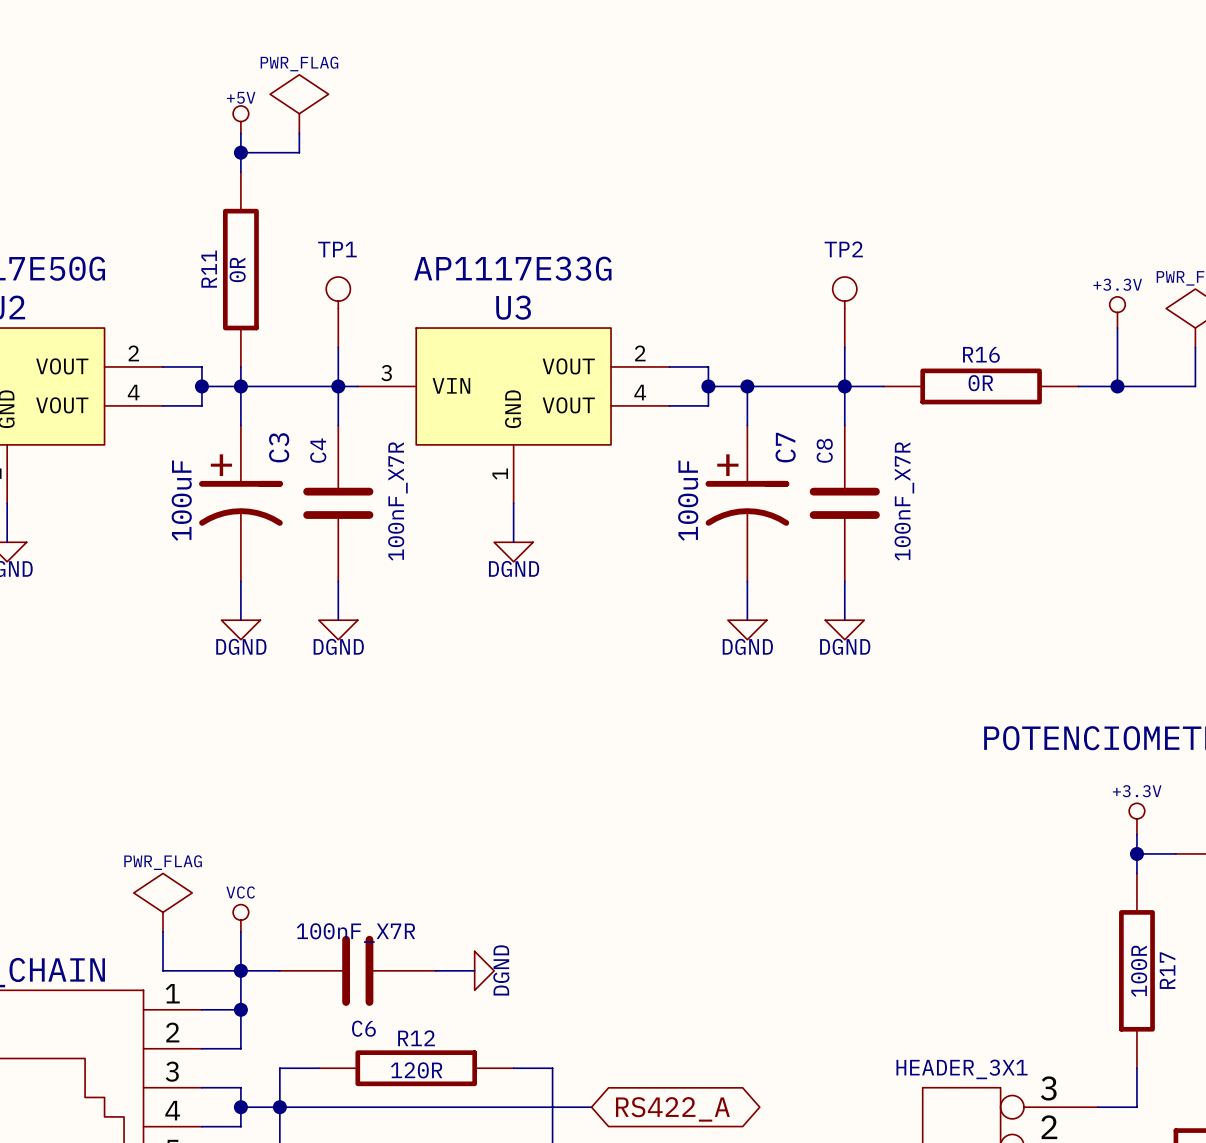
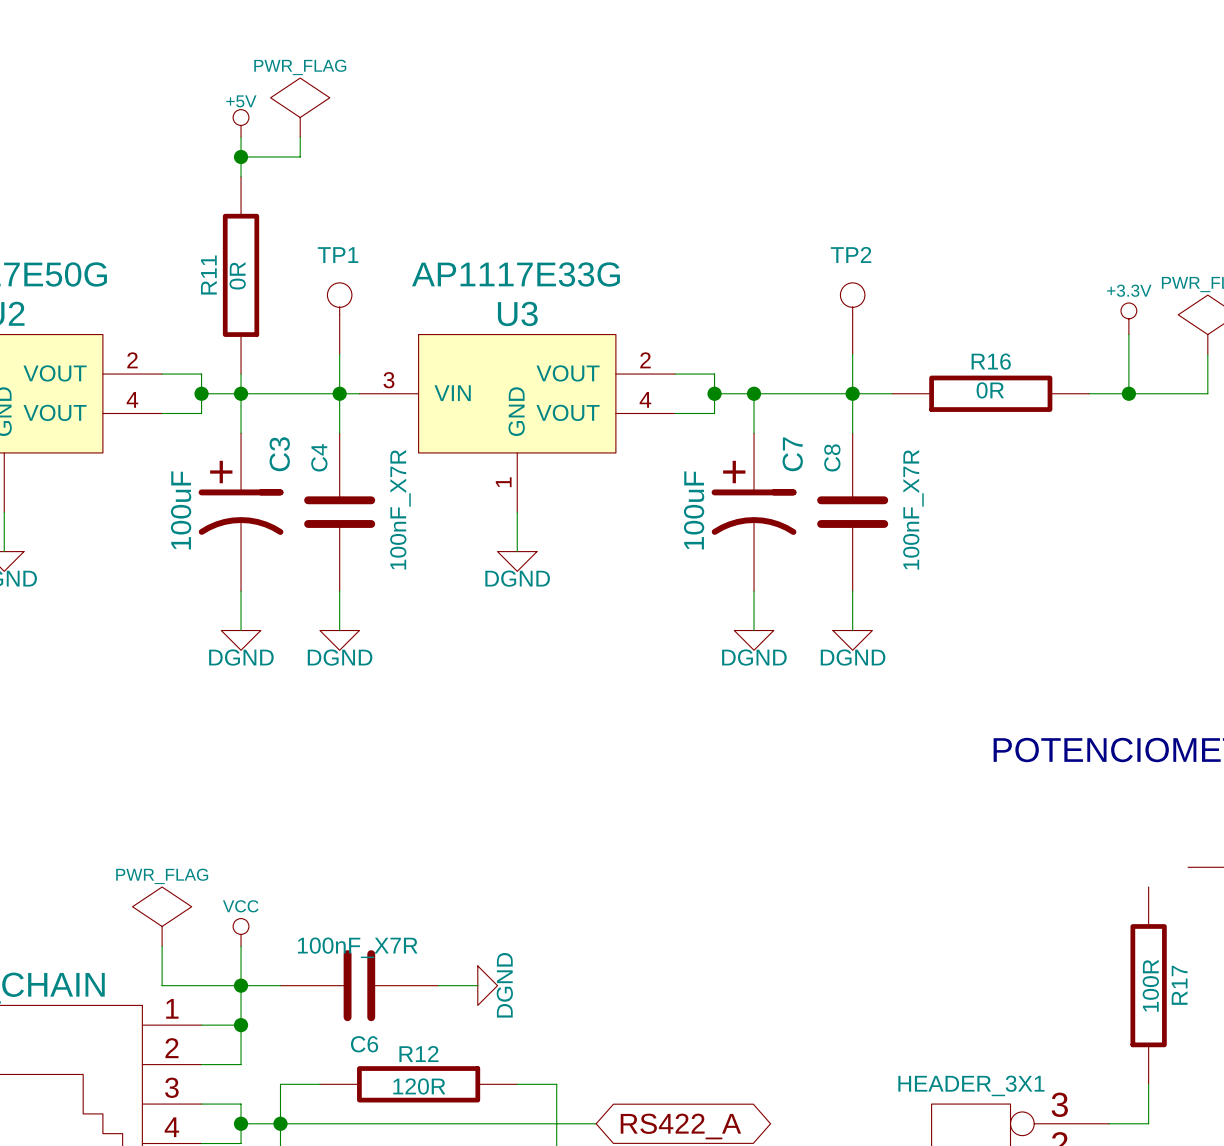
power symbol: +3.3V (1136, 818) -> none
wire: (1136, 834) (1136, 873) -> none
wire: (1136, 853) (1175, 853) -> none
junction: (1136, 853) -> none

